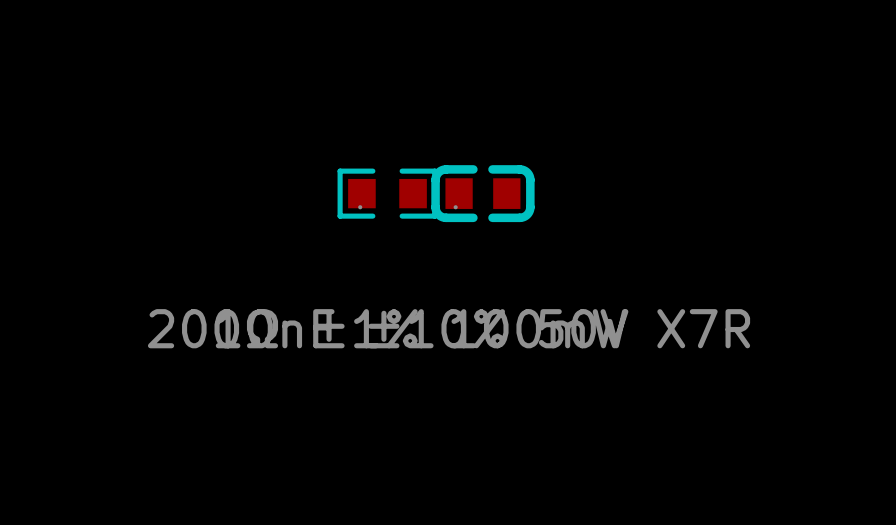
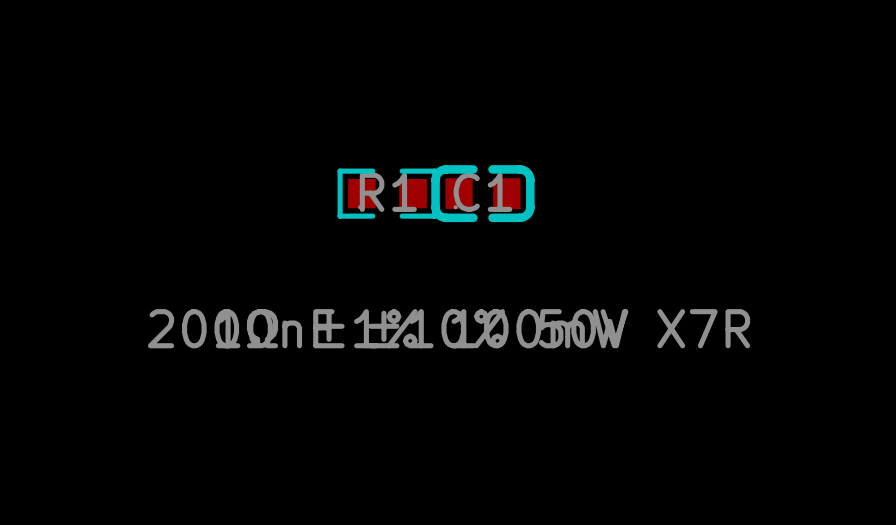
R1 name: none -> R1 (388, 192)
C1 name: none -> C1 (482, 192)

